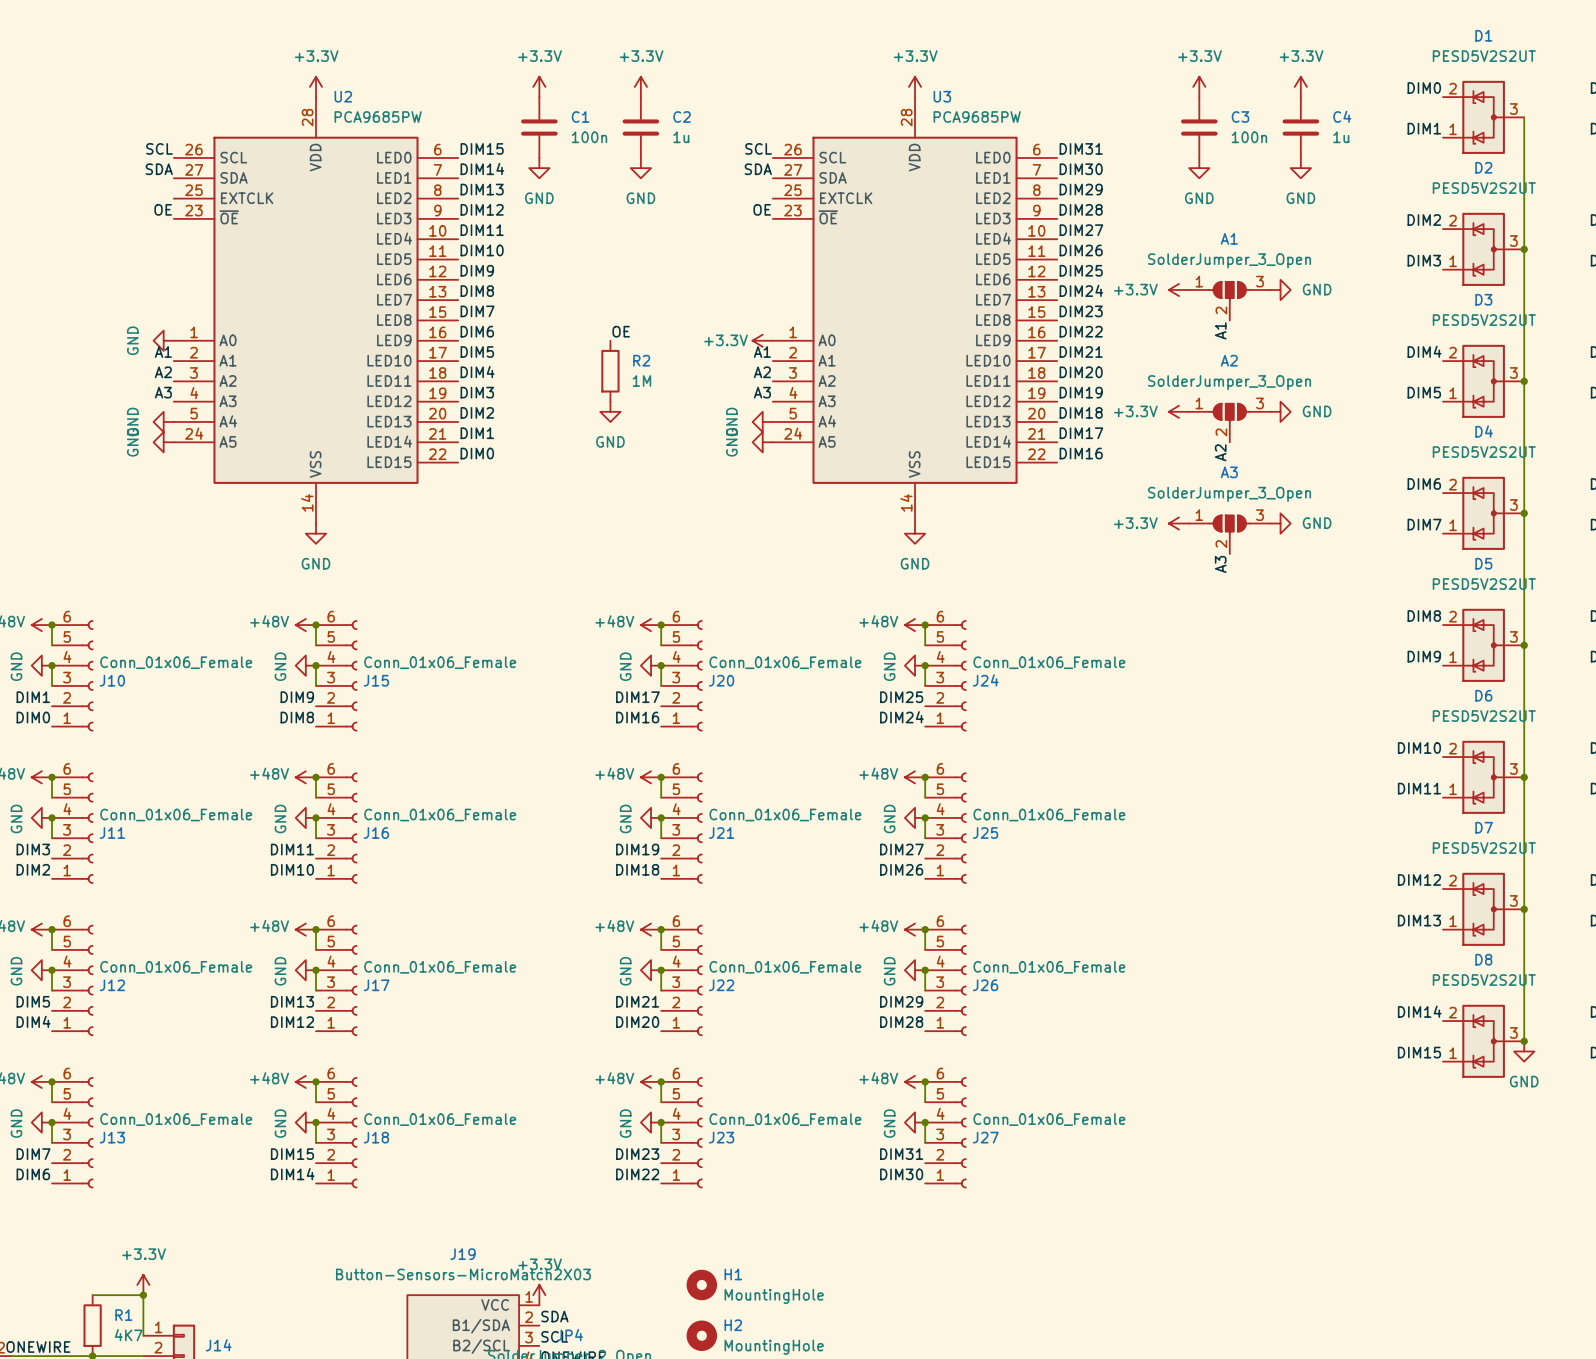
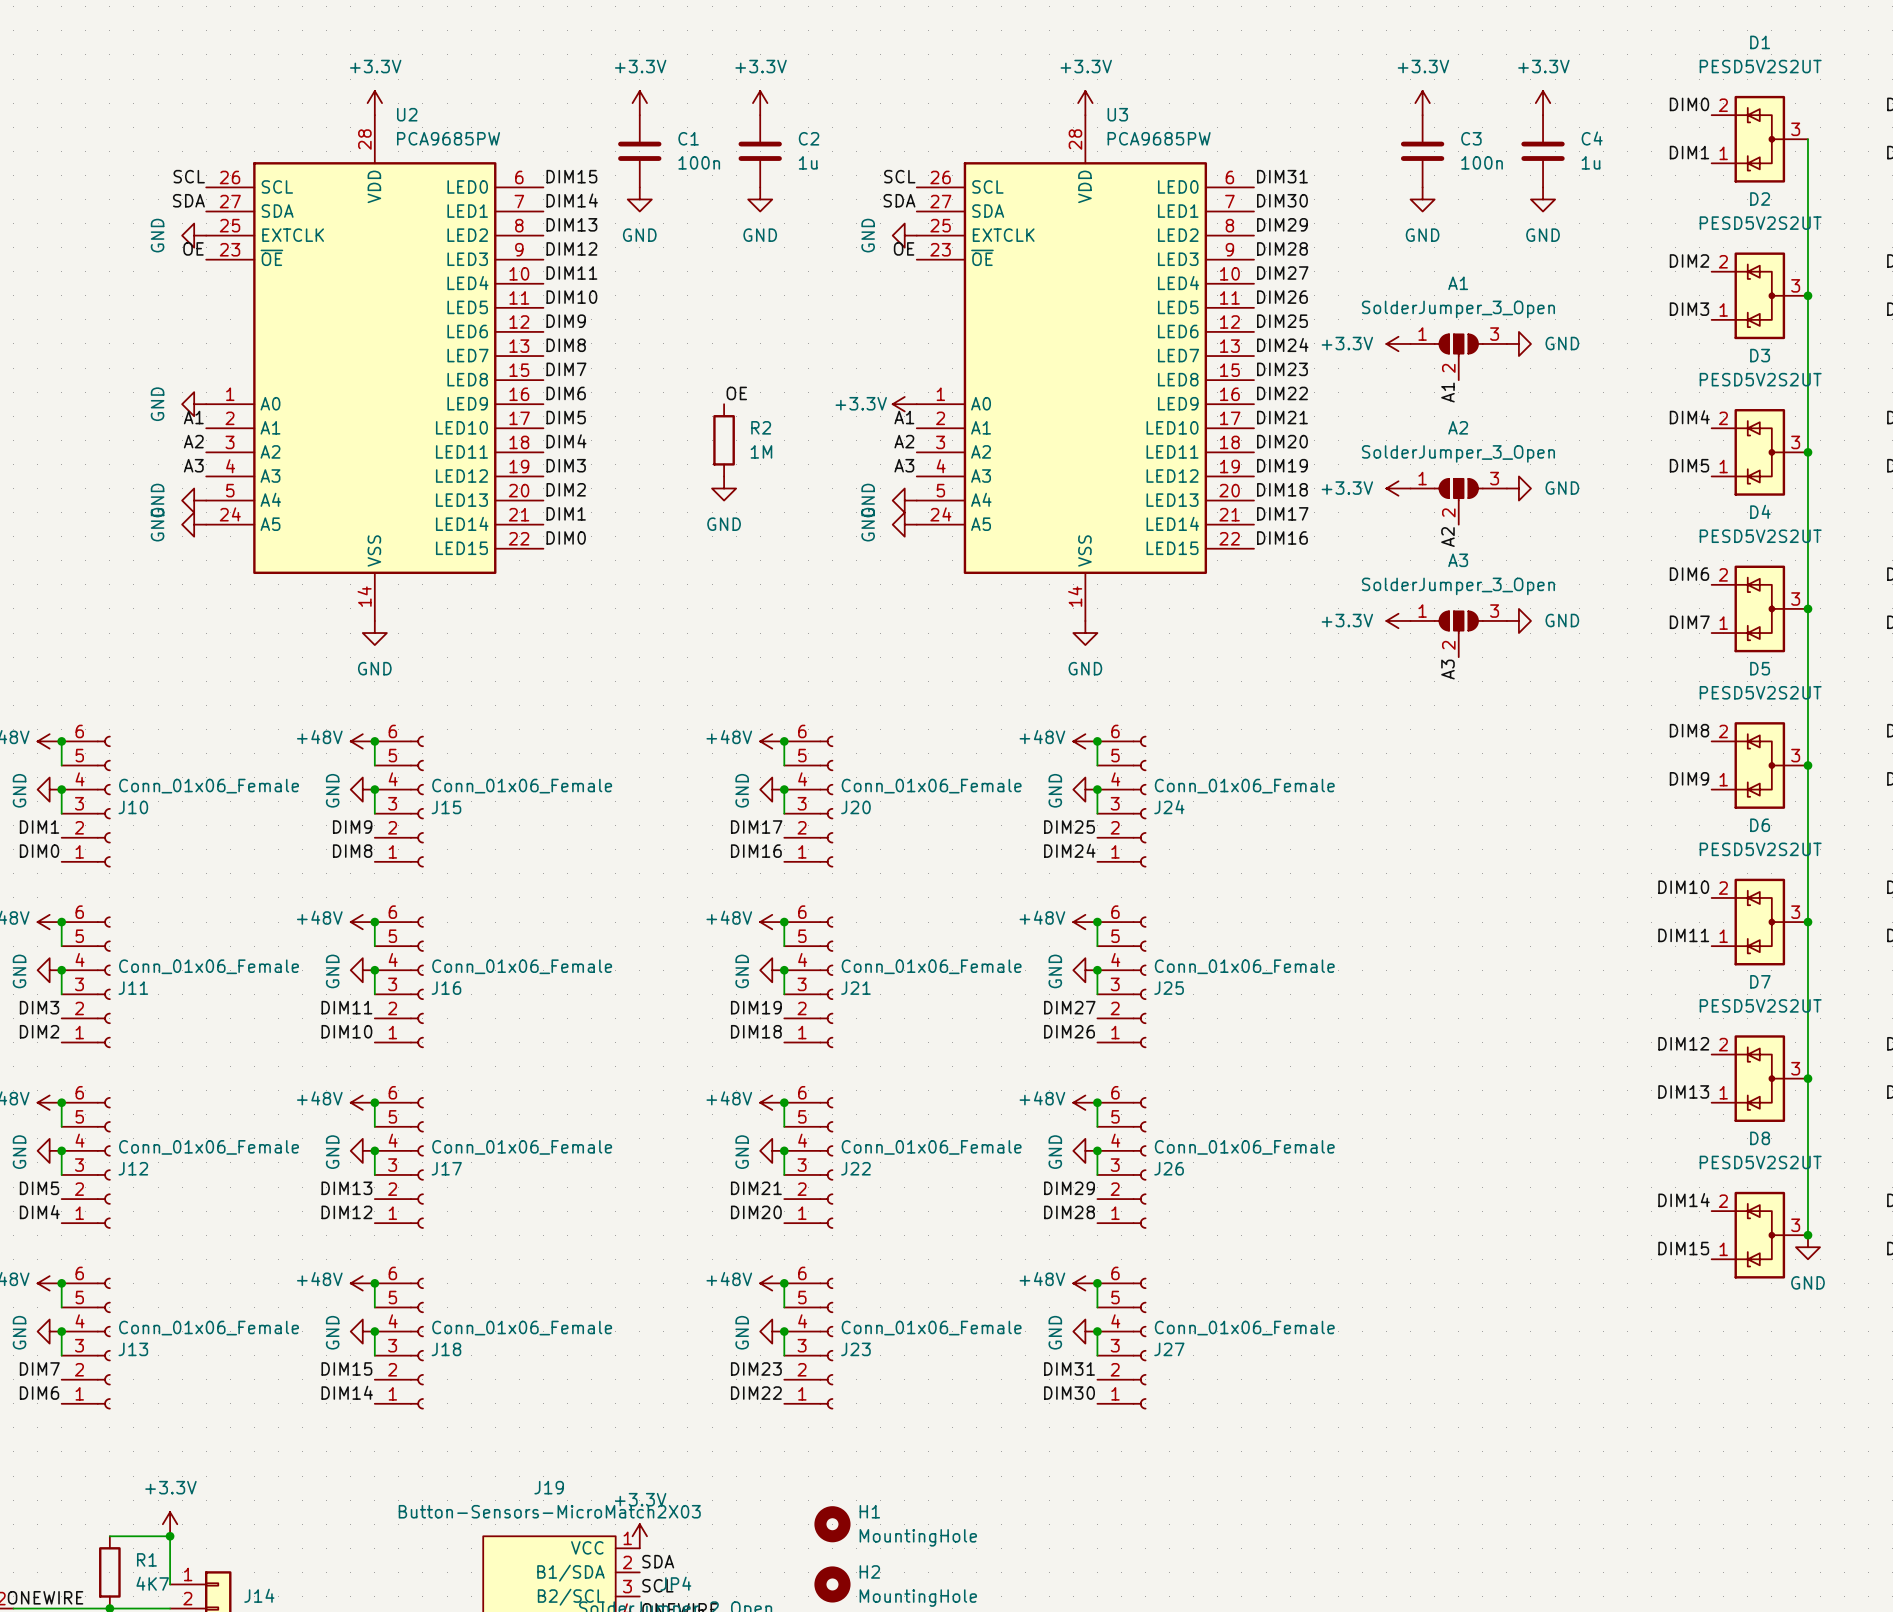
power symbol: none -> GND (194, 235)
power symbol: none -> GND (904, 235)

